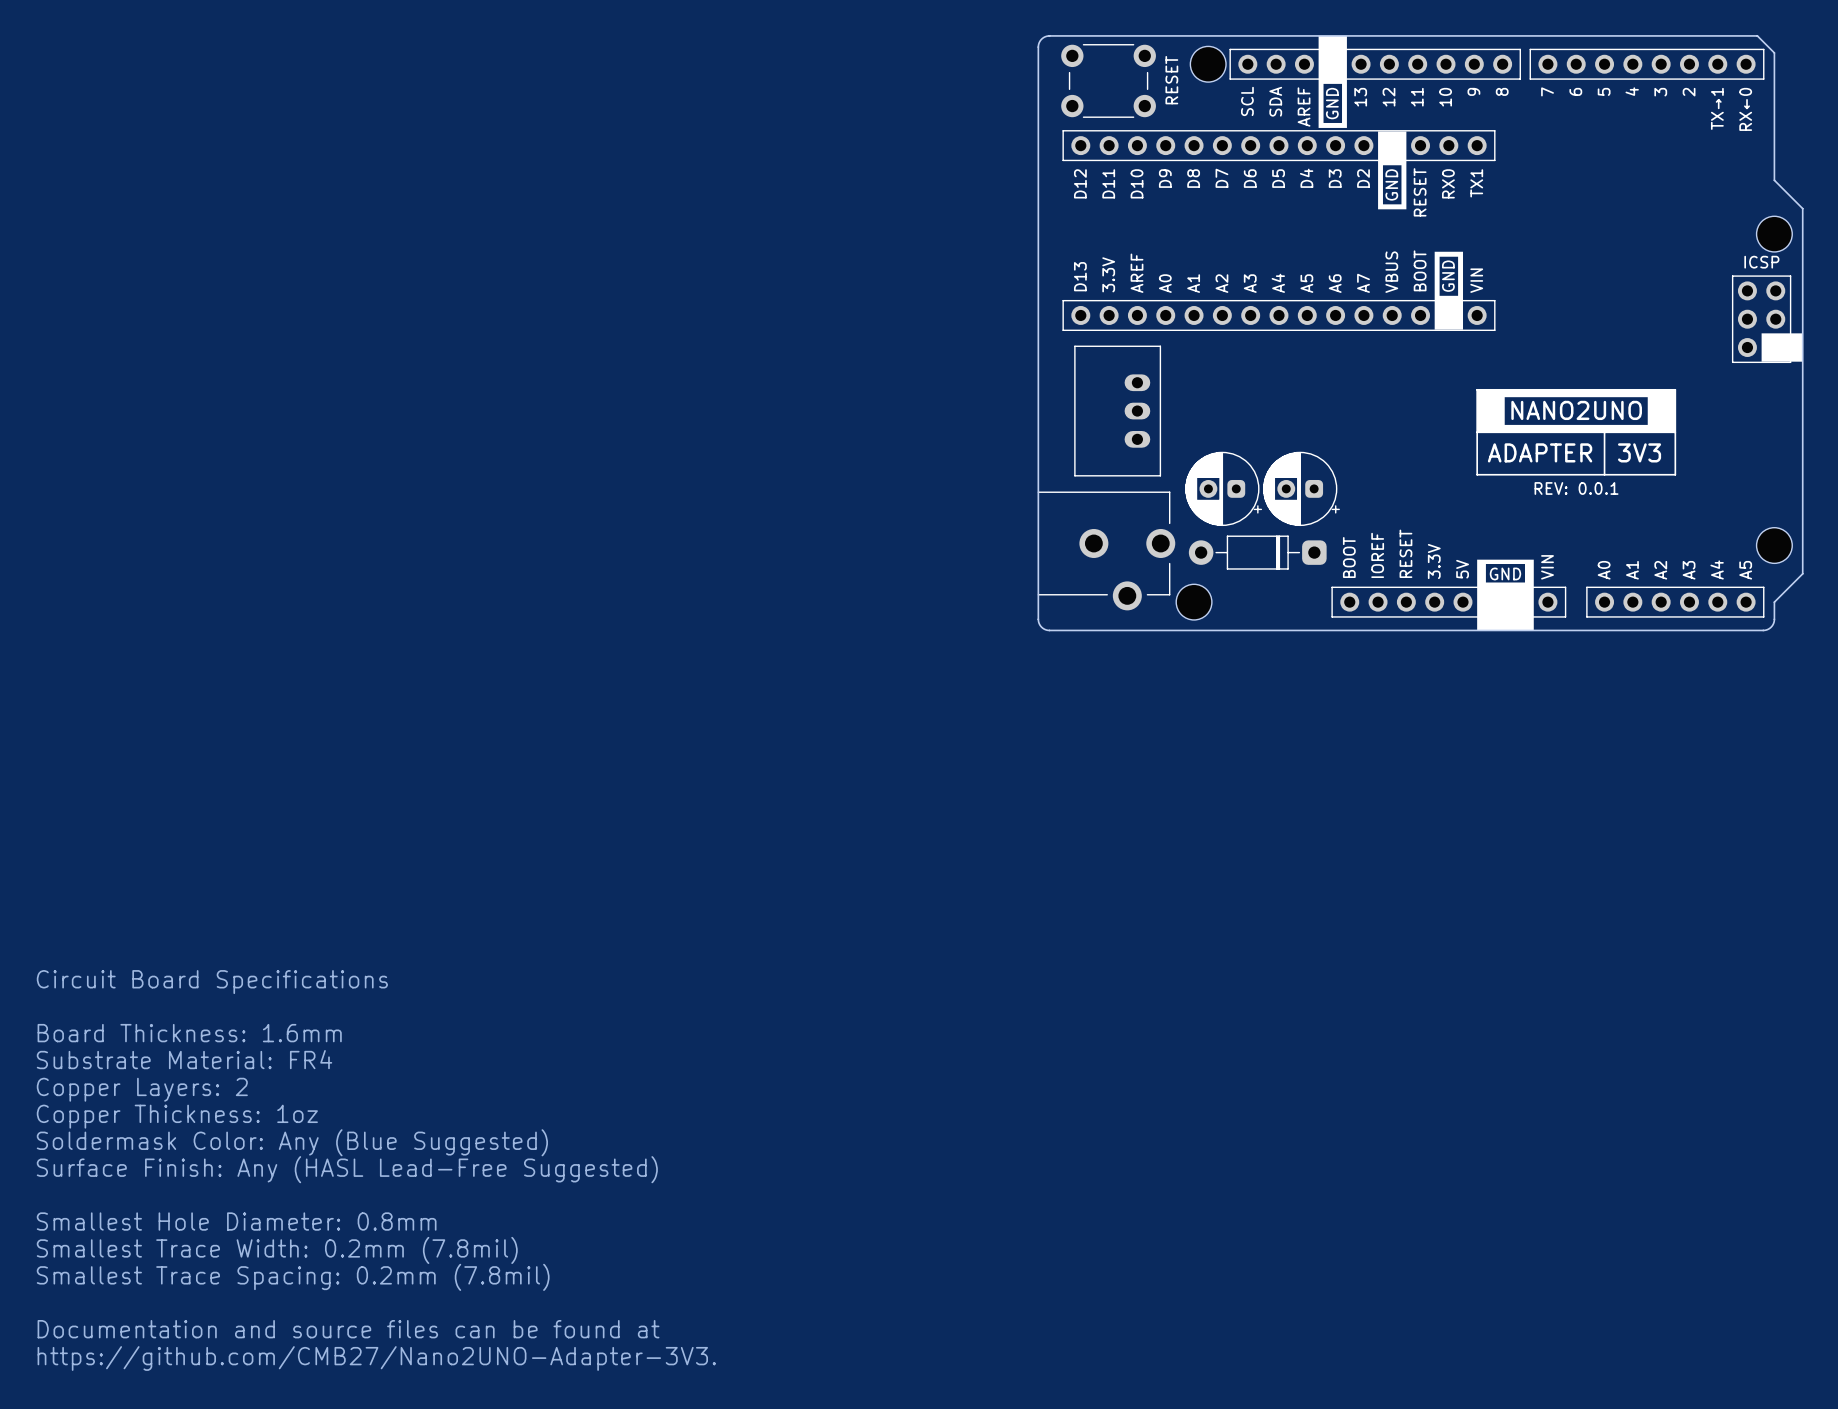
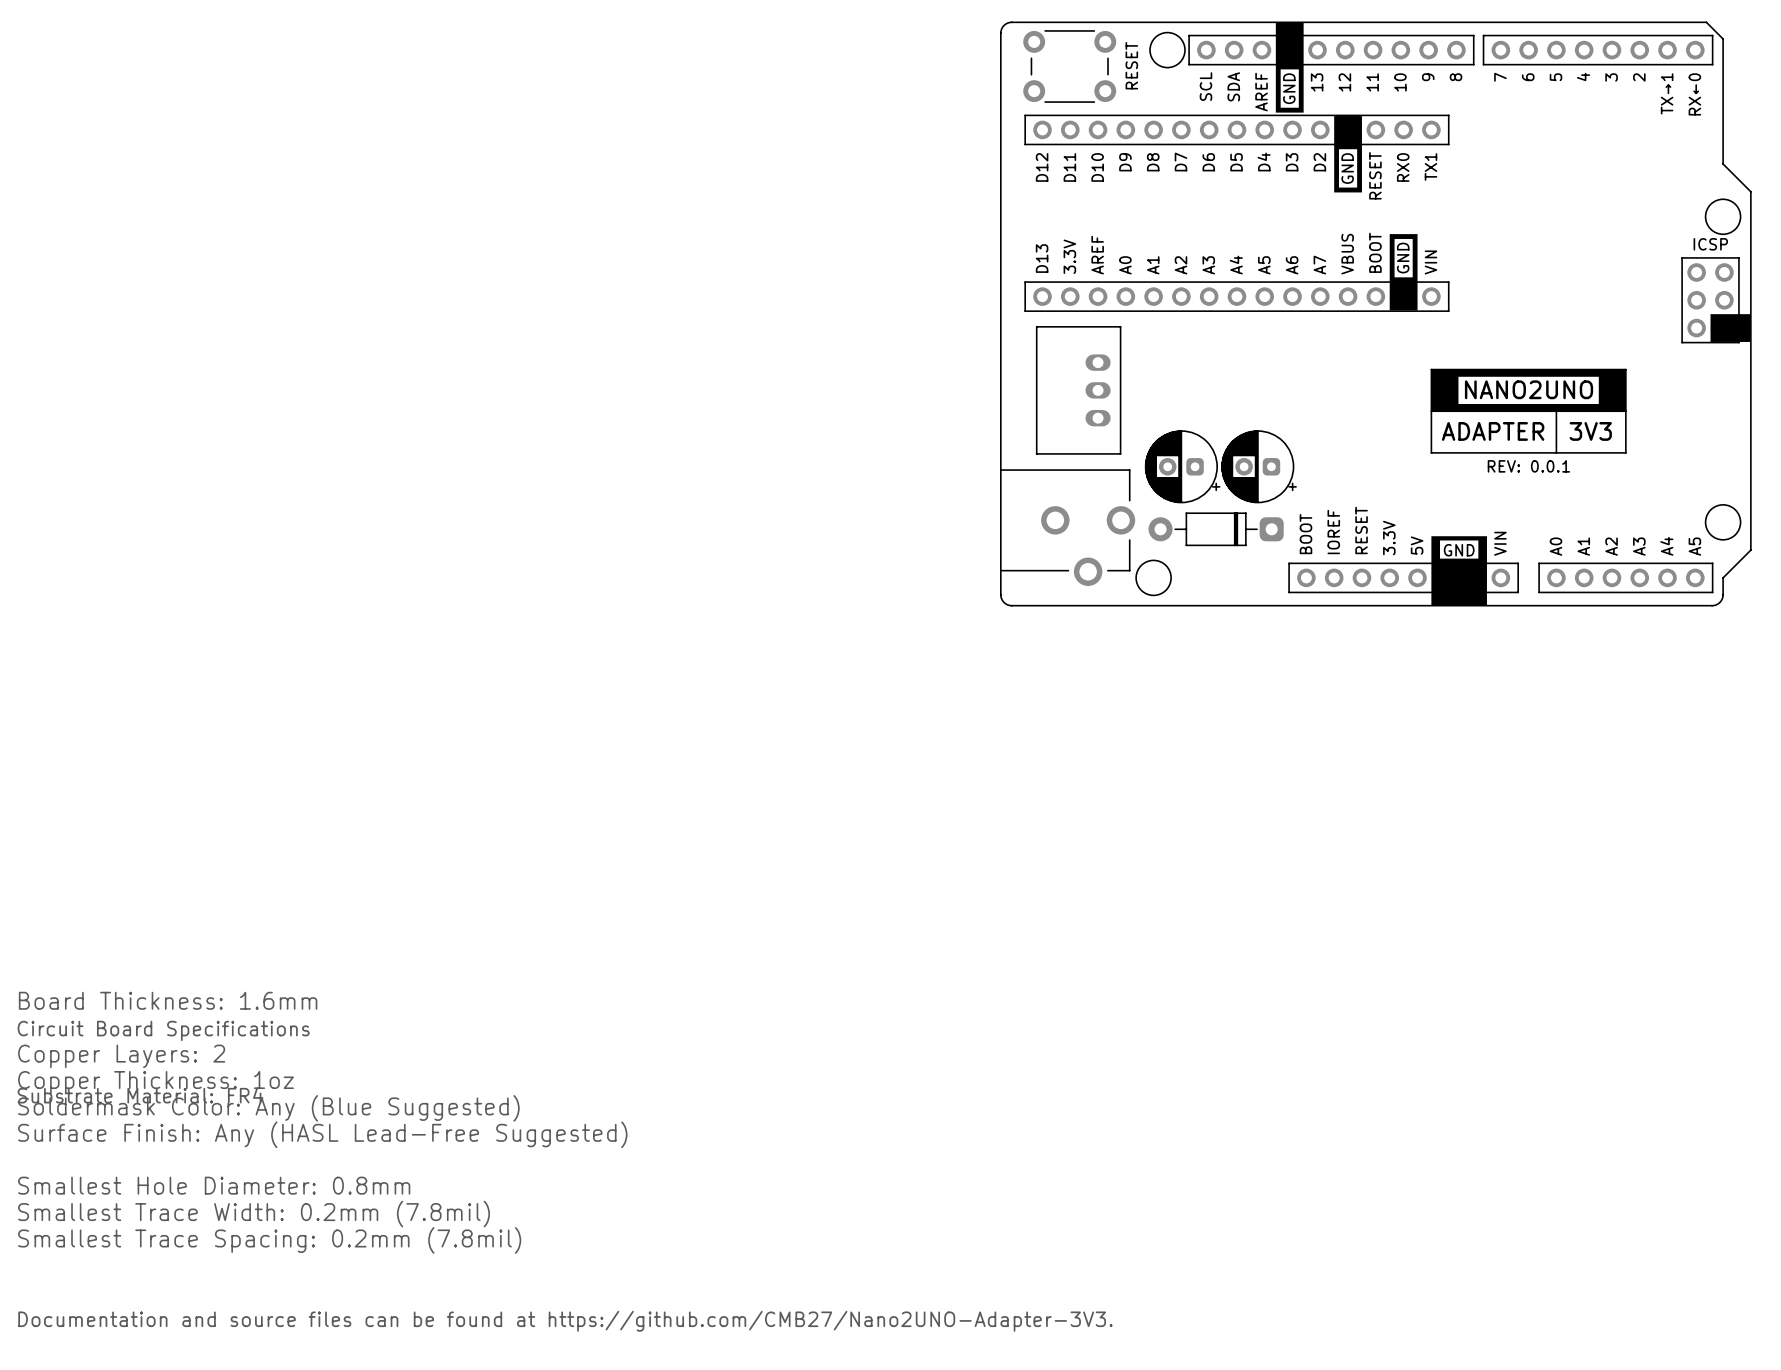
text: Circuit Board Specifications (212, 982) -> none
text: Substrate Material: FR4 (184, 1059) -> Circuit Board Specifications (163, 1030)
text: none -> Substrate Material: FR4 (140, 1095)
text: Documentation and source files can be found at (348, 1329) -> none
text: https://github.com/CMB27/Nano2UNO-Adapter-3V3. (376, 1358) -> Documentation and source files can be found at https://github.com/CMB27/Nano2UNO-Adapter-3V3. (565, 1321)

